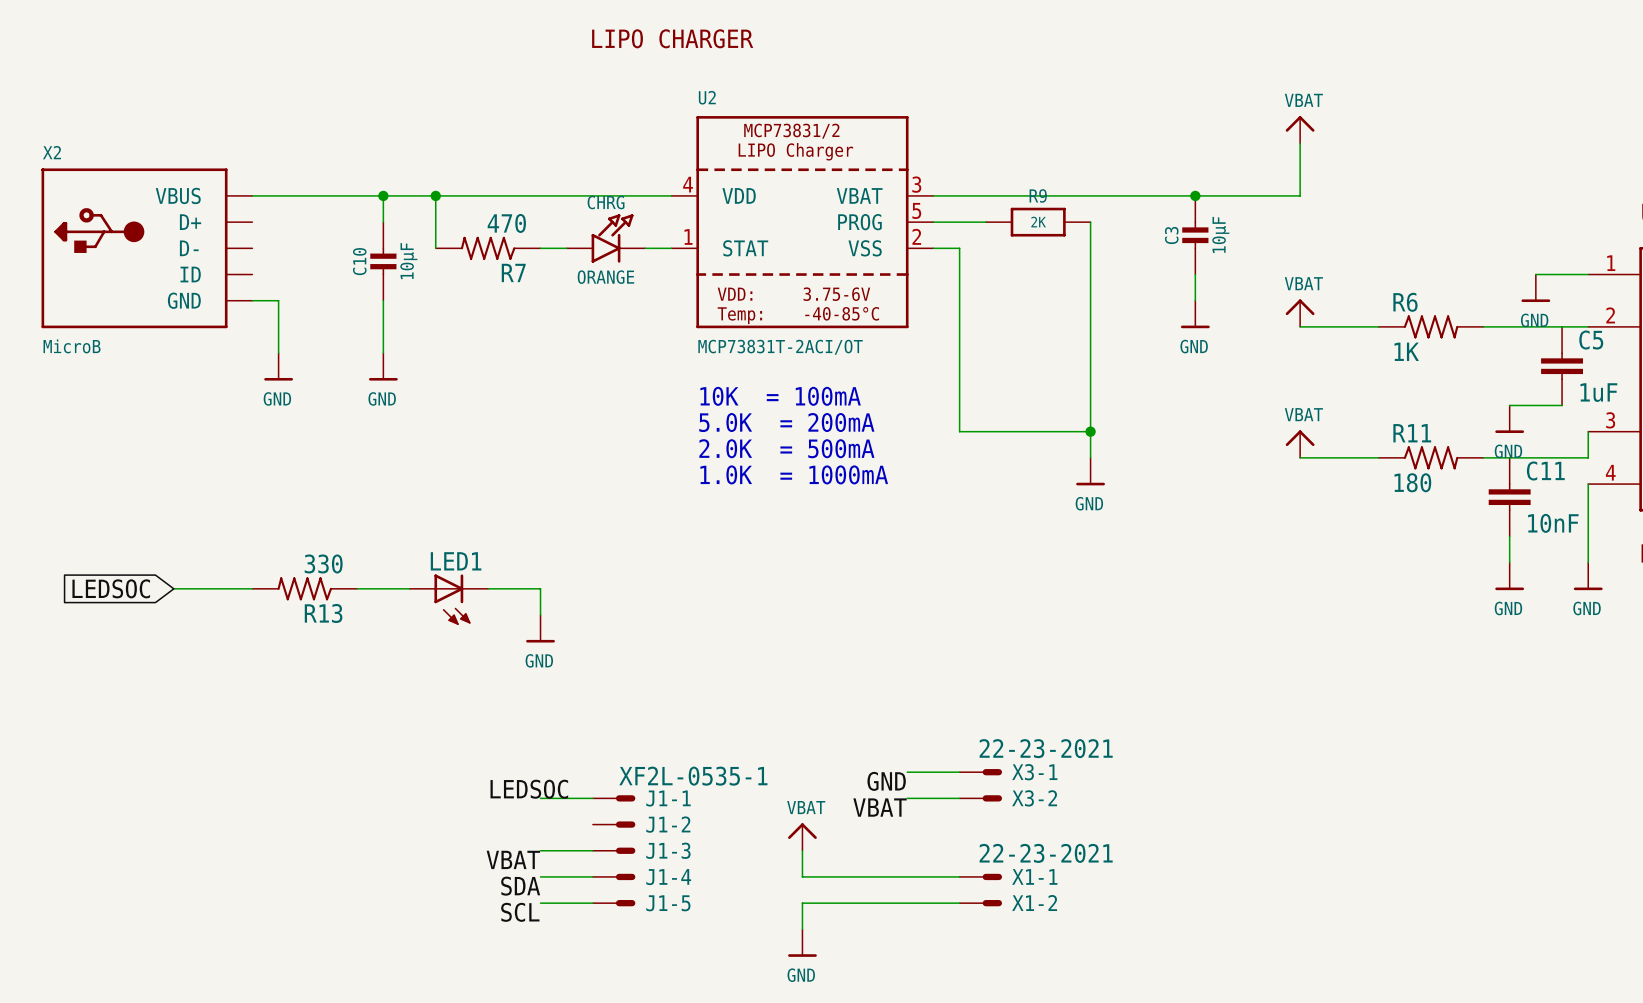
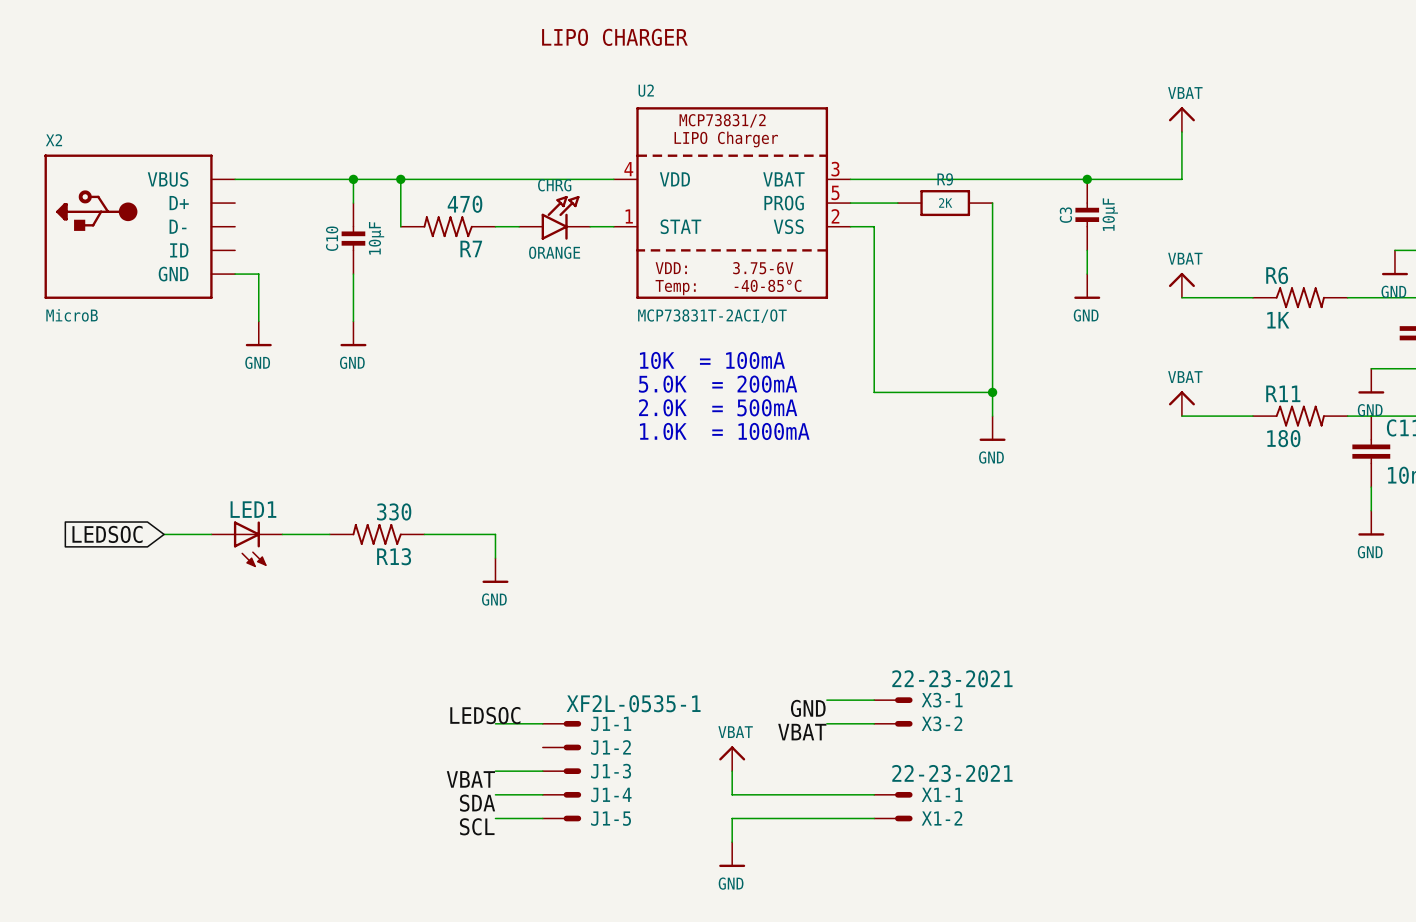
R13 position: (304, 588) -> (377, 534)
LED1 position: (448, 599) -> (246, 544)

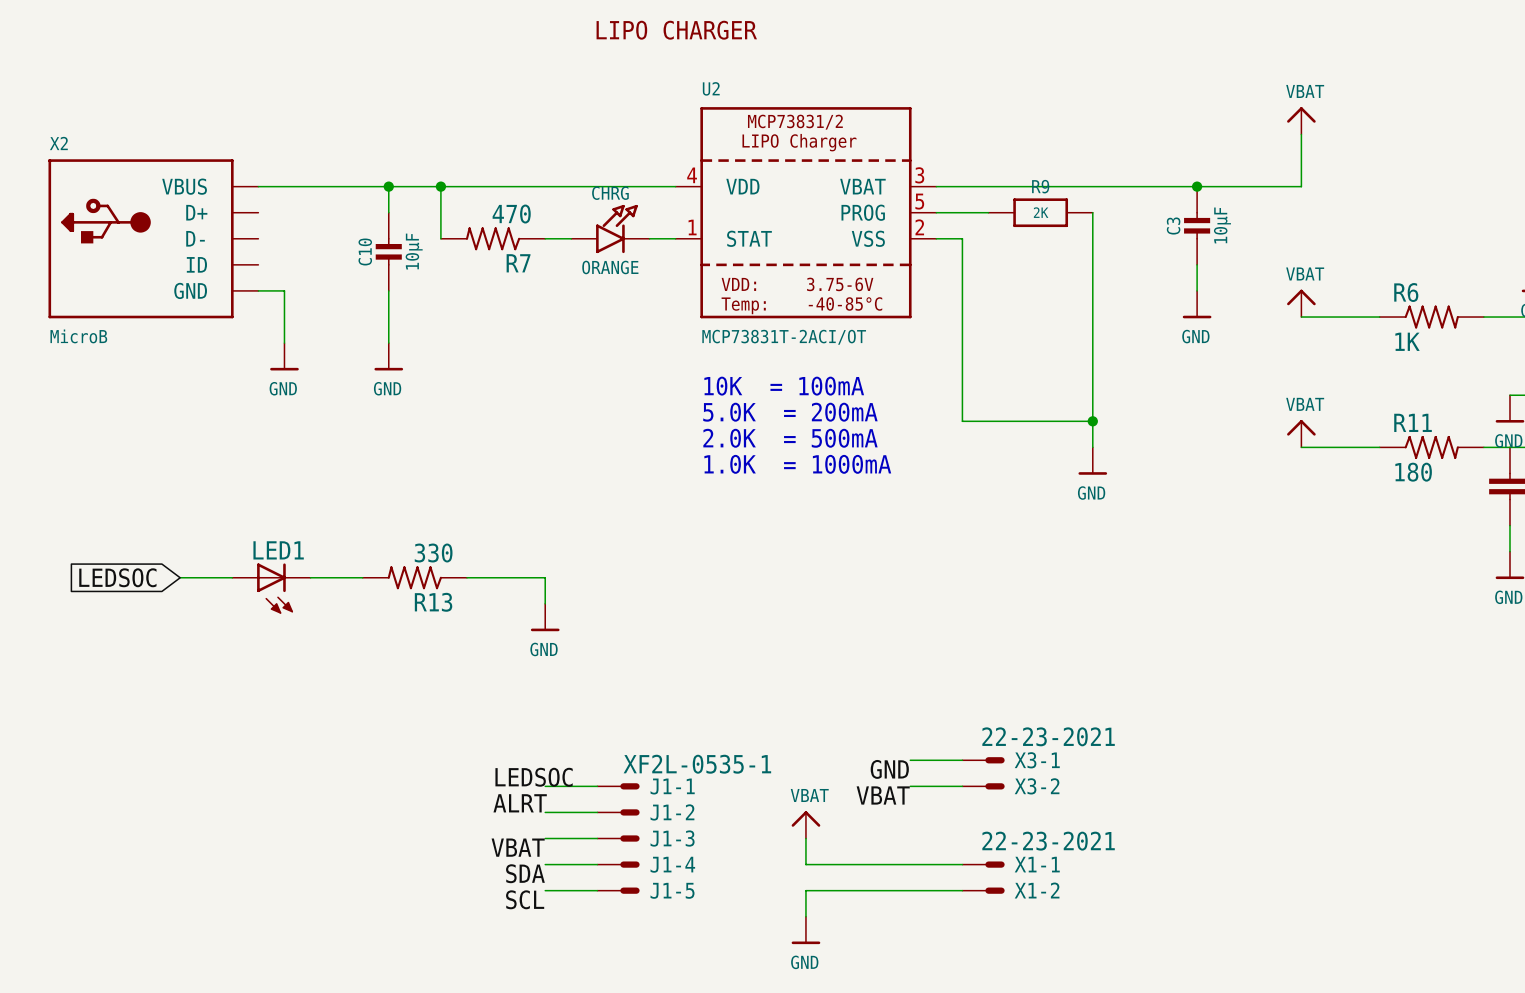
label: none -> ALRT (520, 803)
wire: none -> (545, 812) (597, 812)

